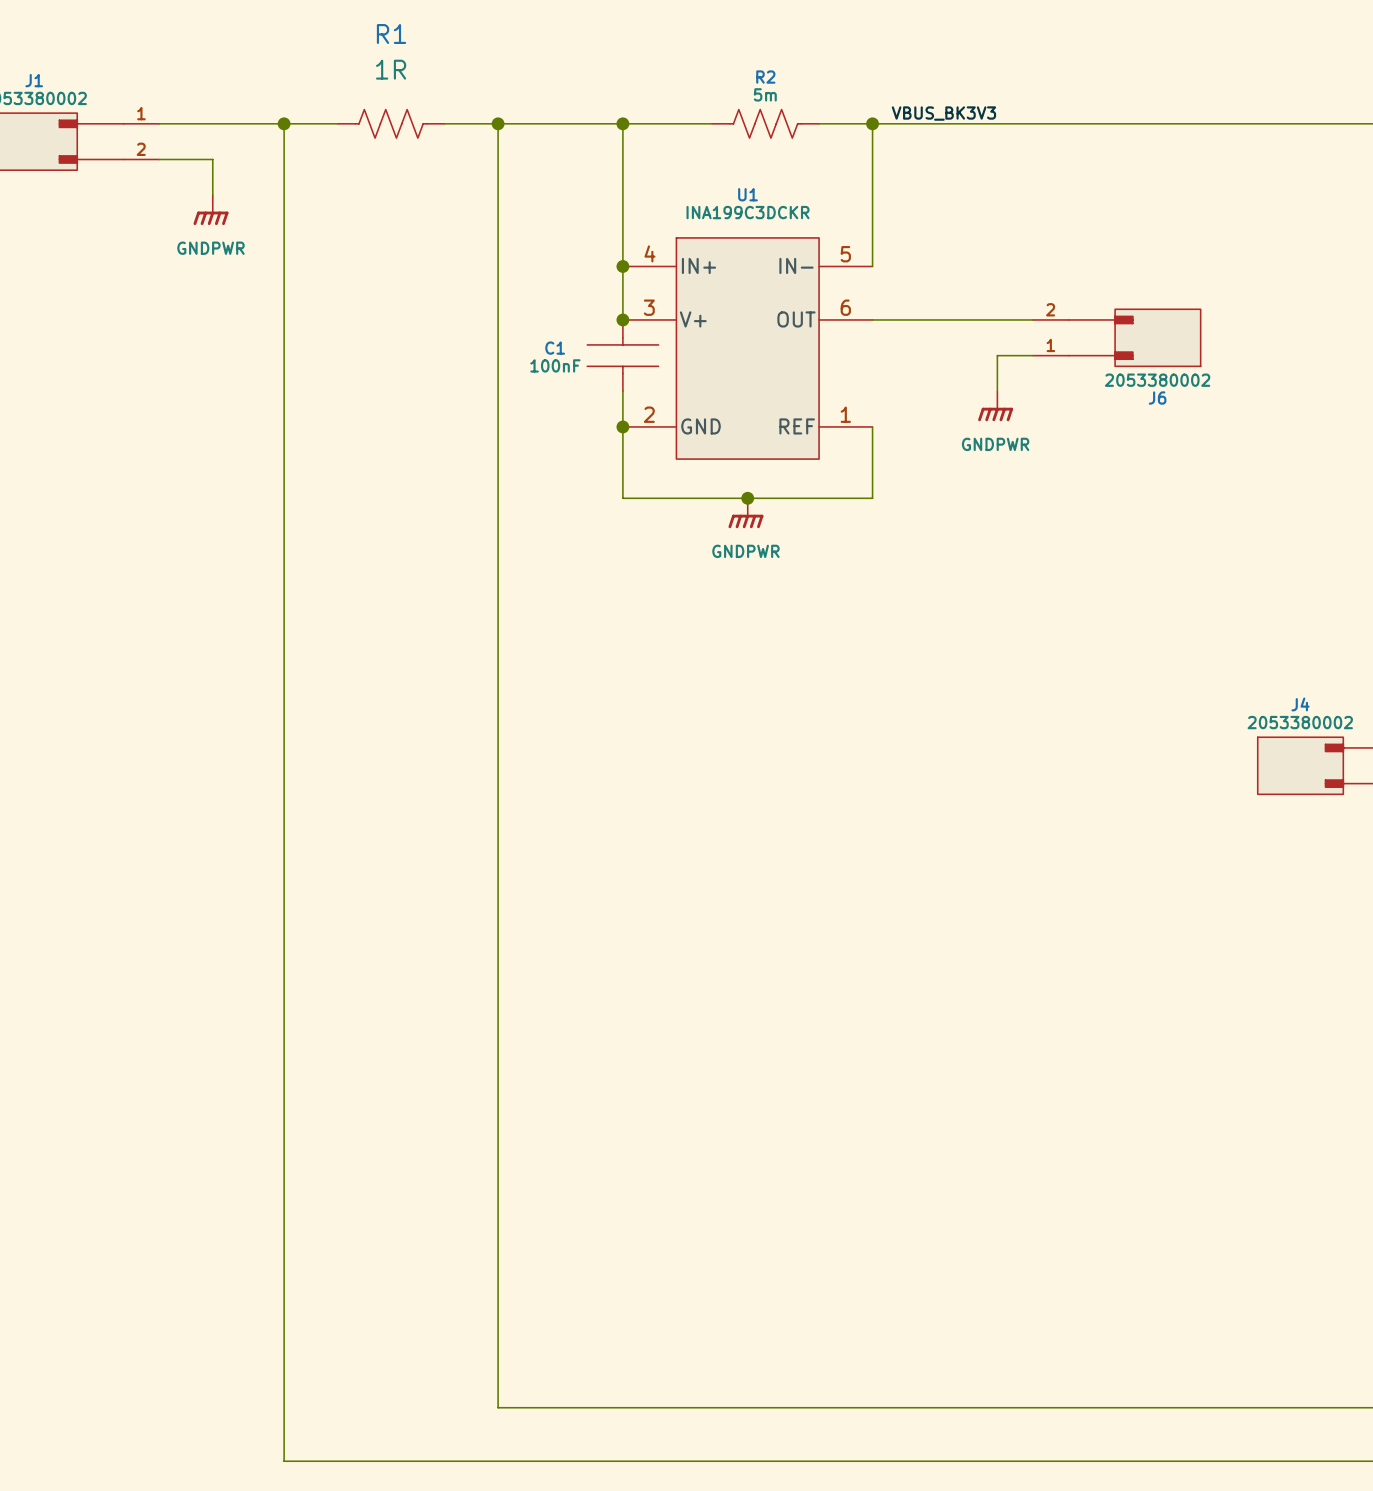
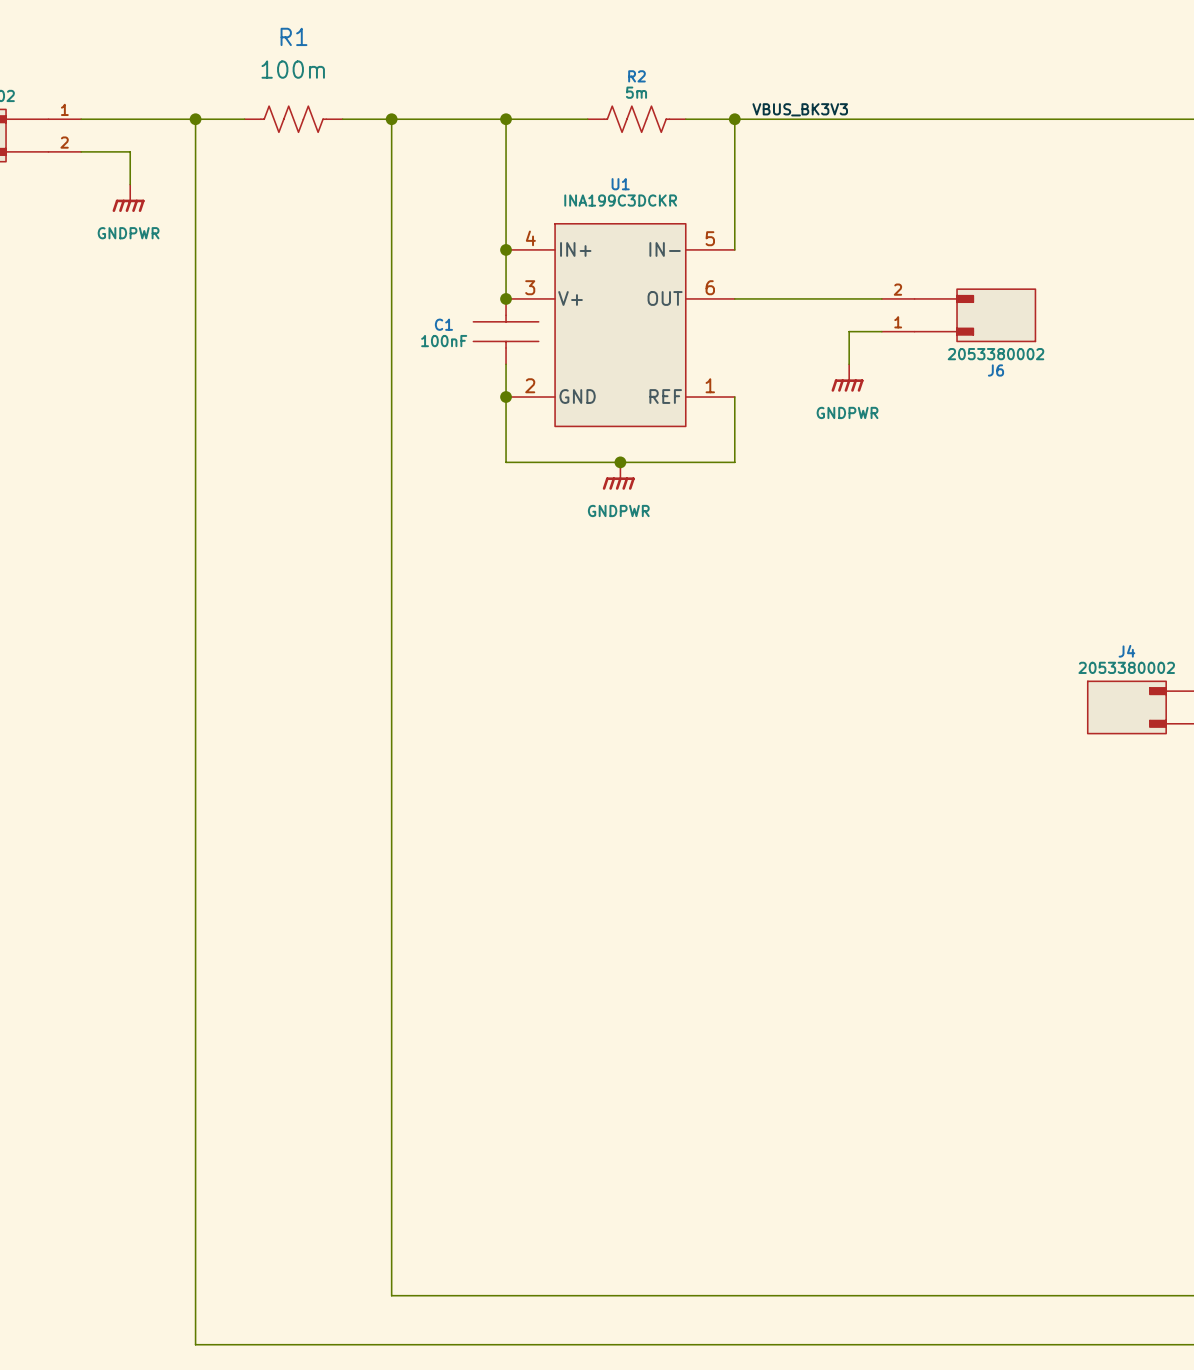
R1 value: 1R (391, 69) -> 100m (293, 69)

